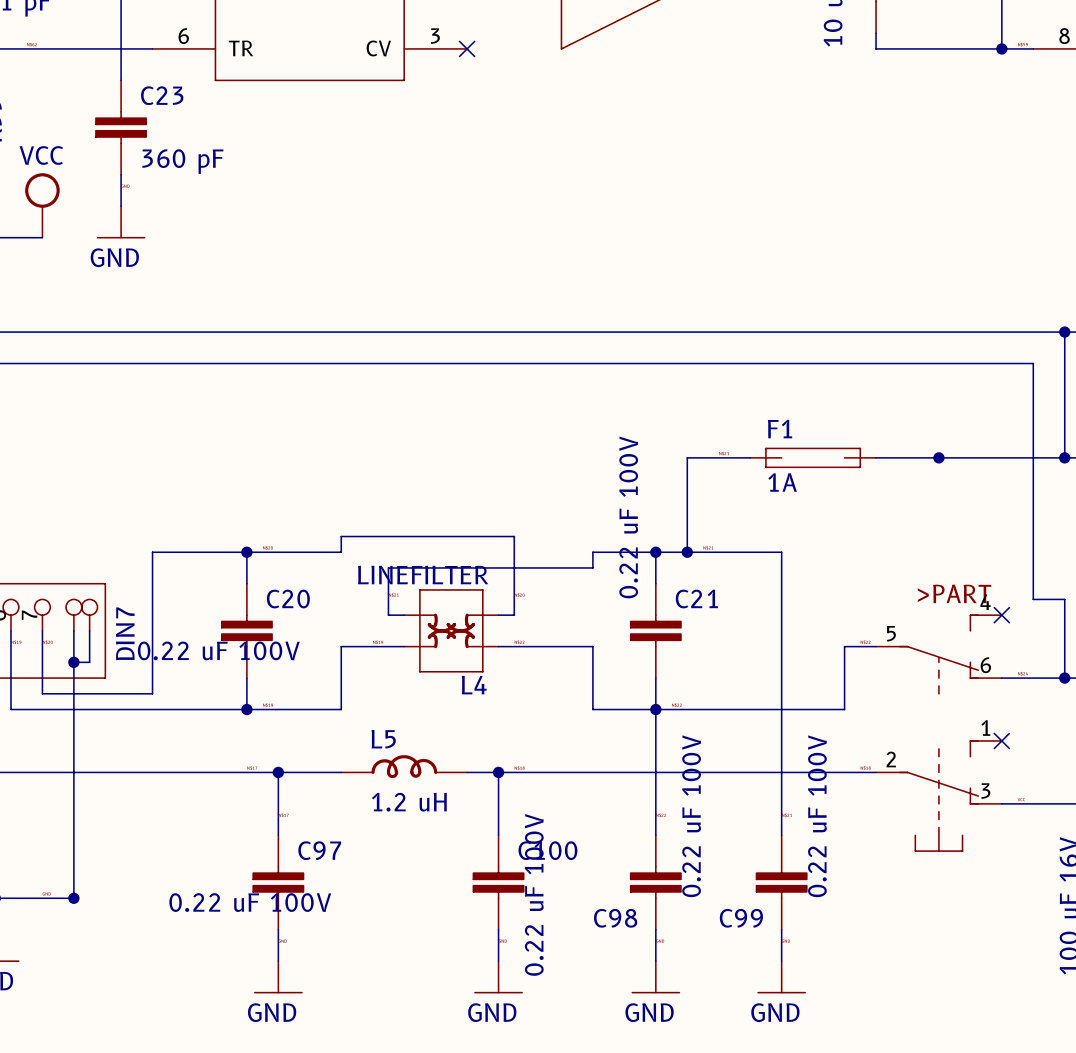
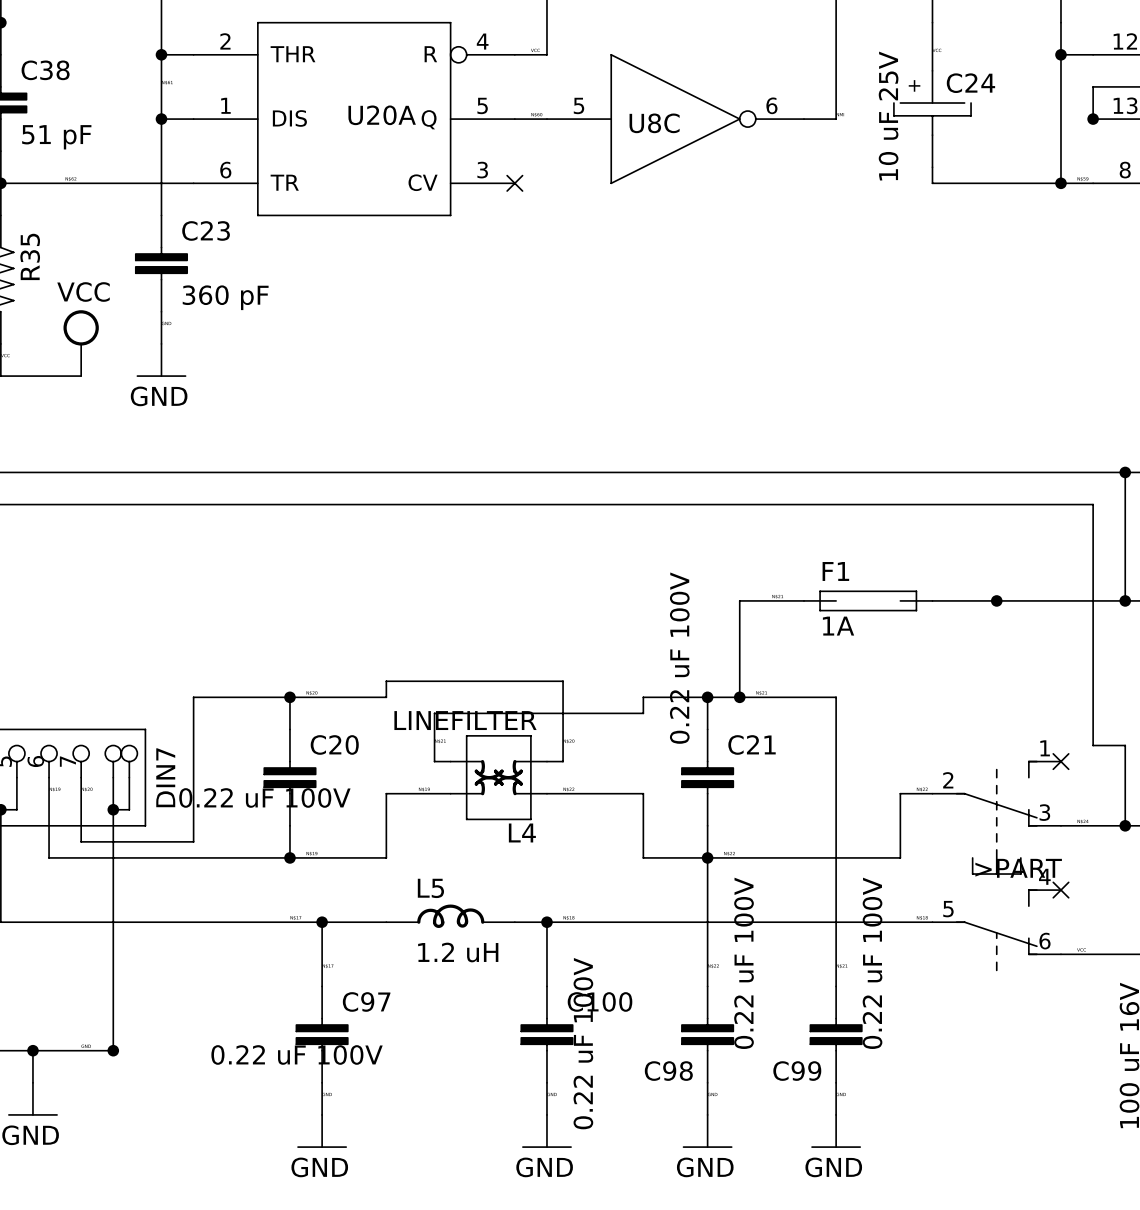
part position: (938, 654) -> (996, 930)
part position: (938, 796) -> (996, 817)

